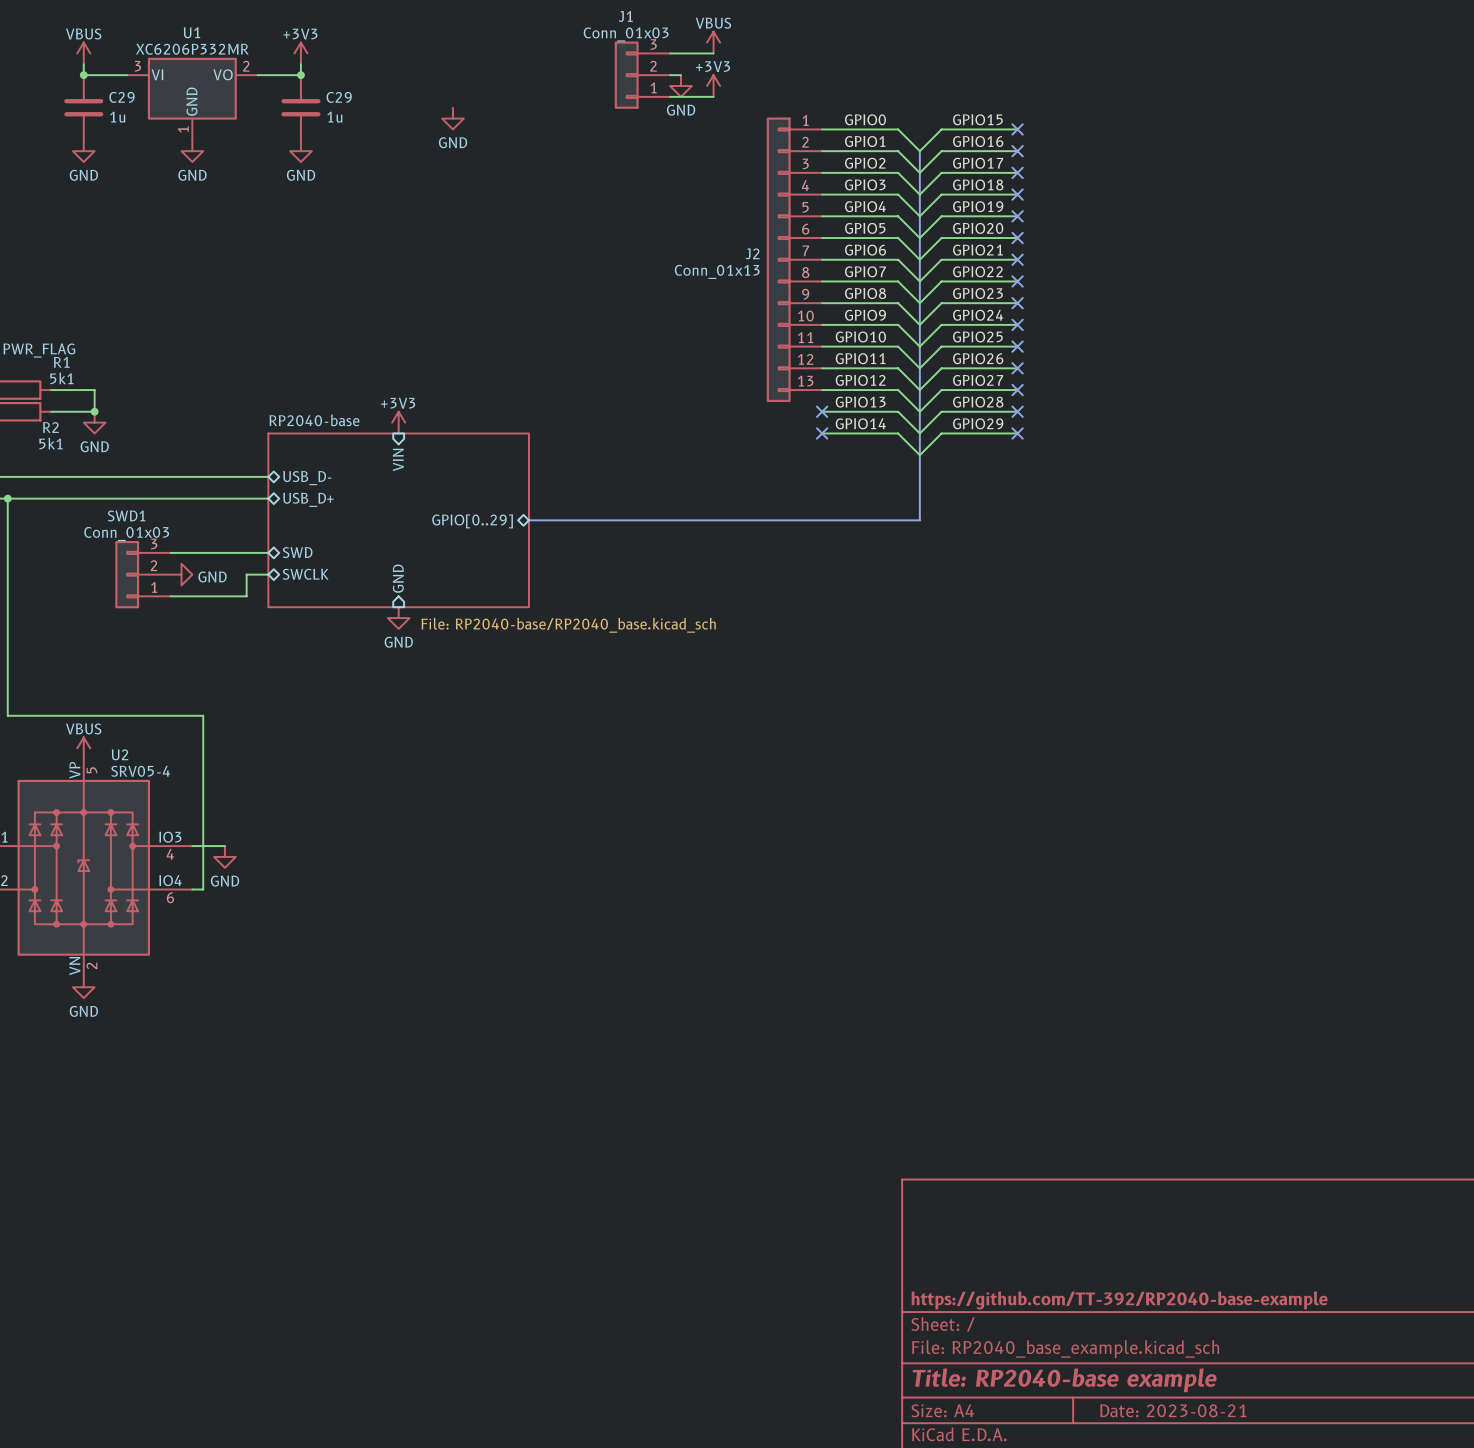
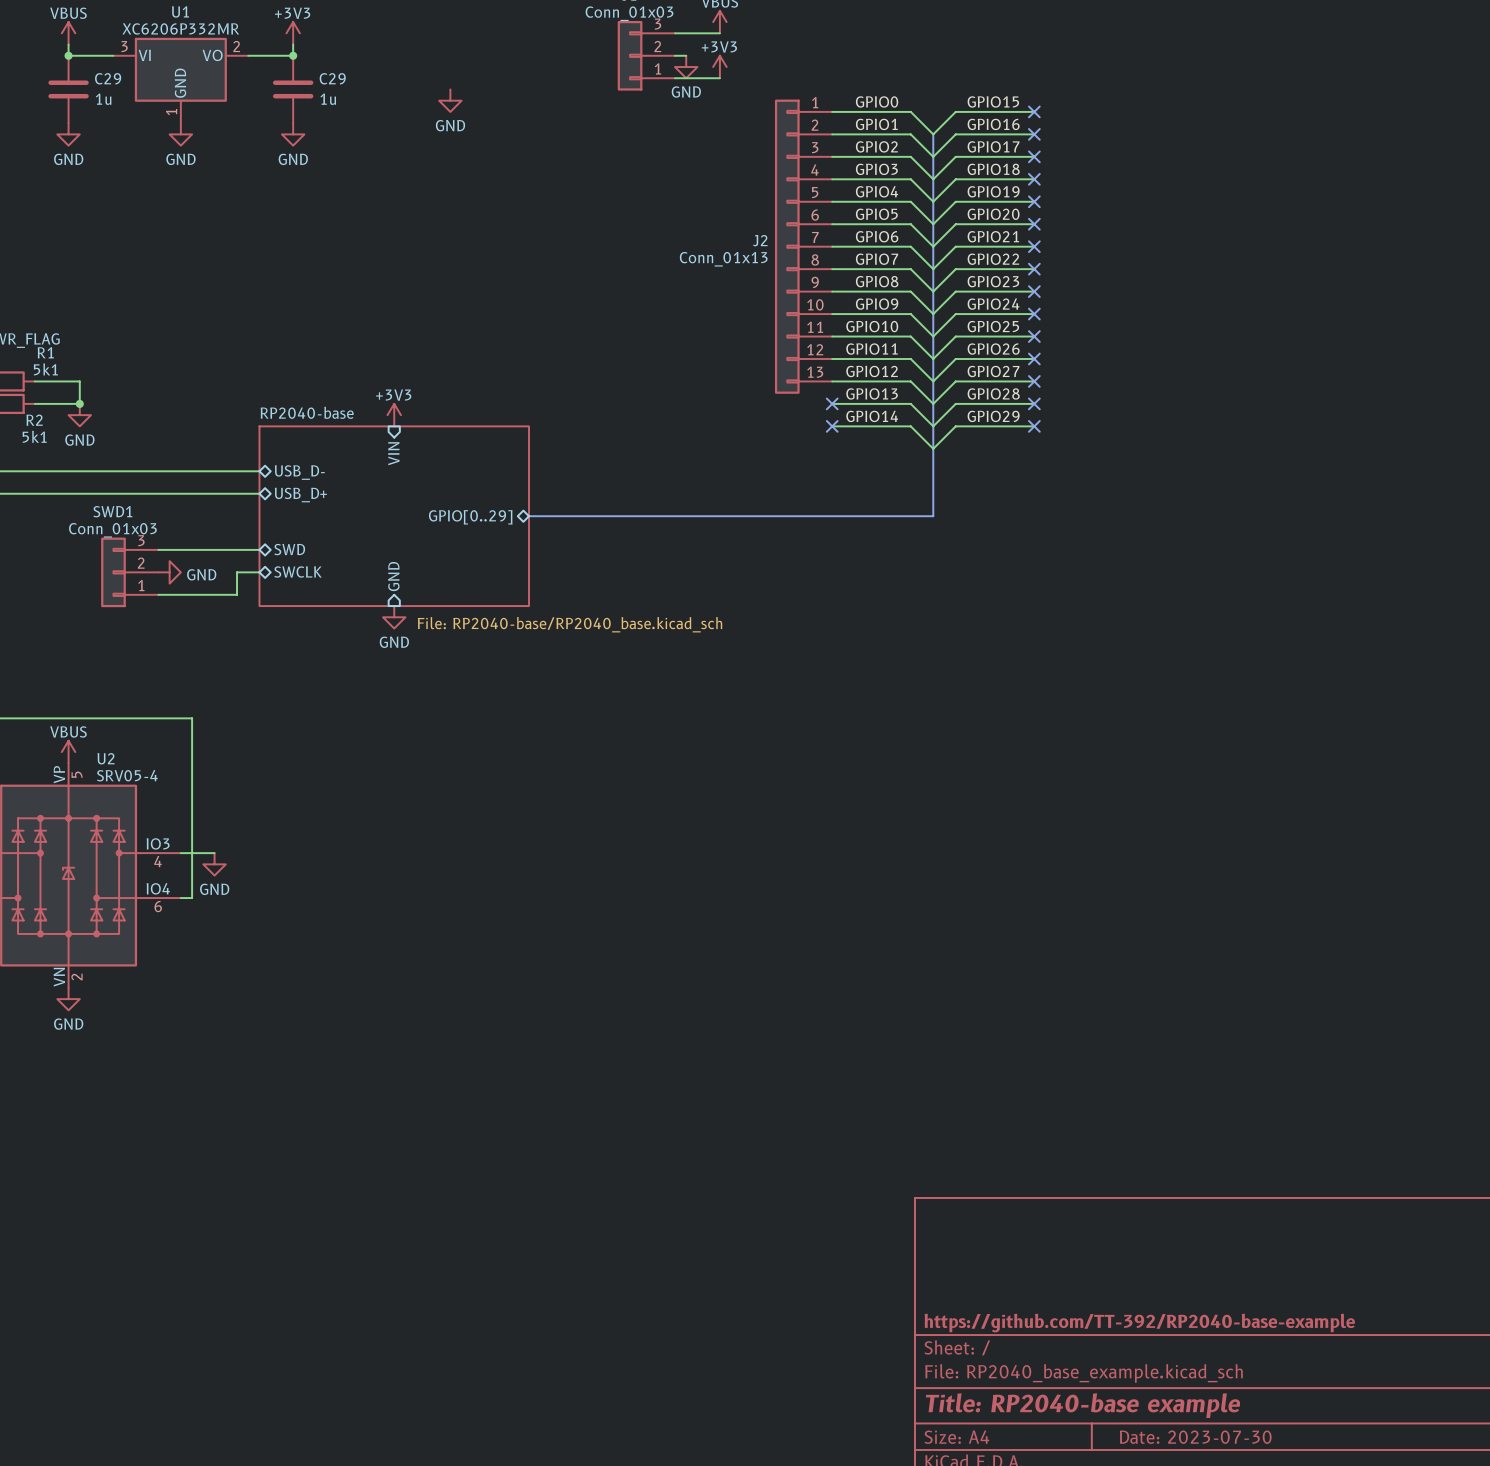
title block: Date: 2023-08-21 (1173, 1410) -> Date: 2023-07-30 (1195, 1437)

